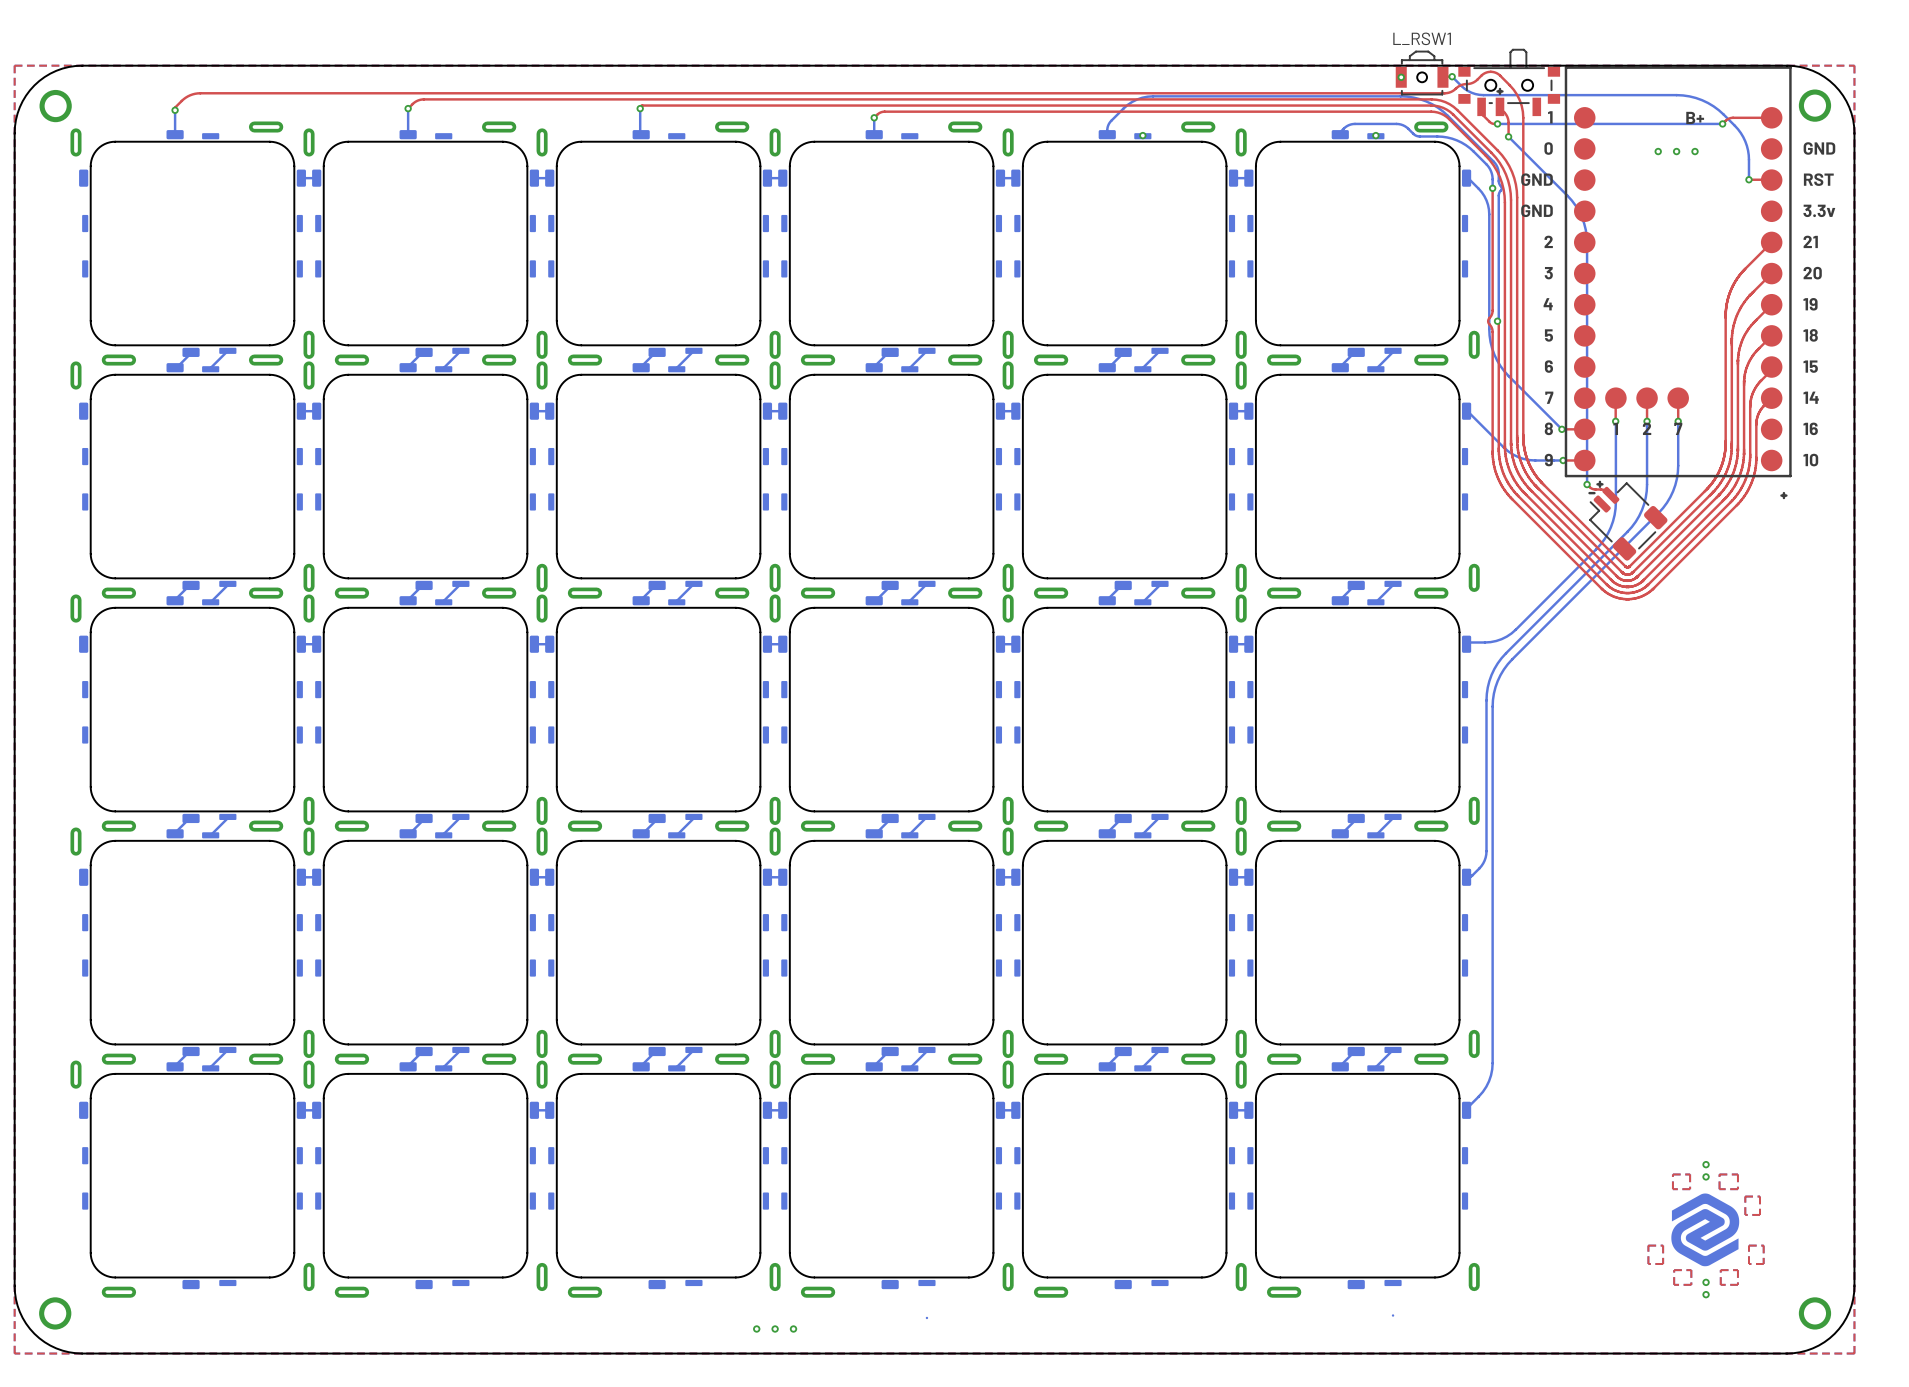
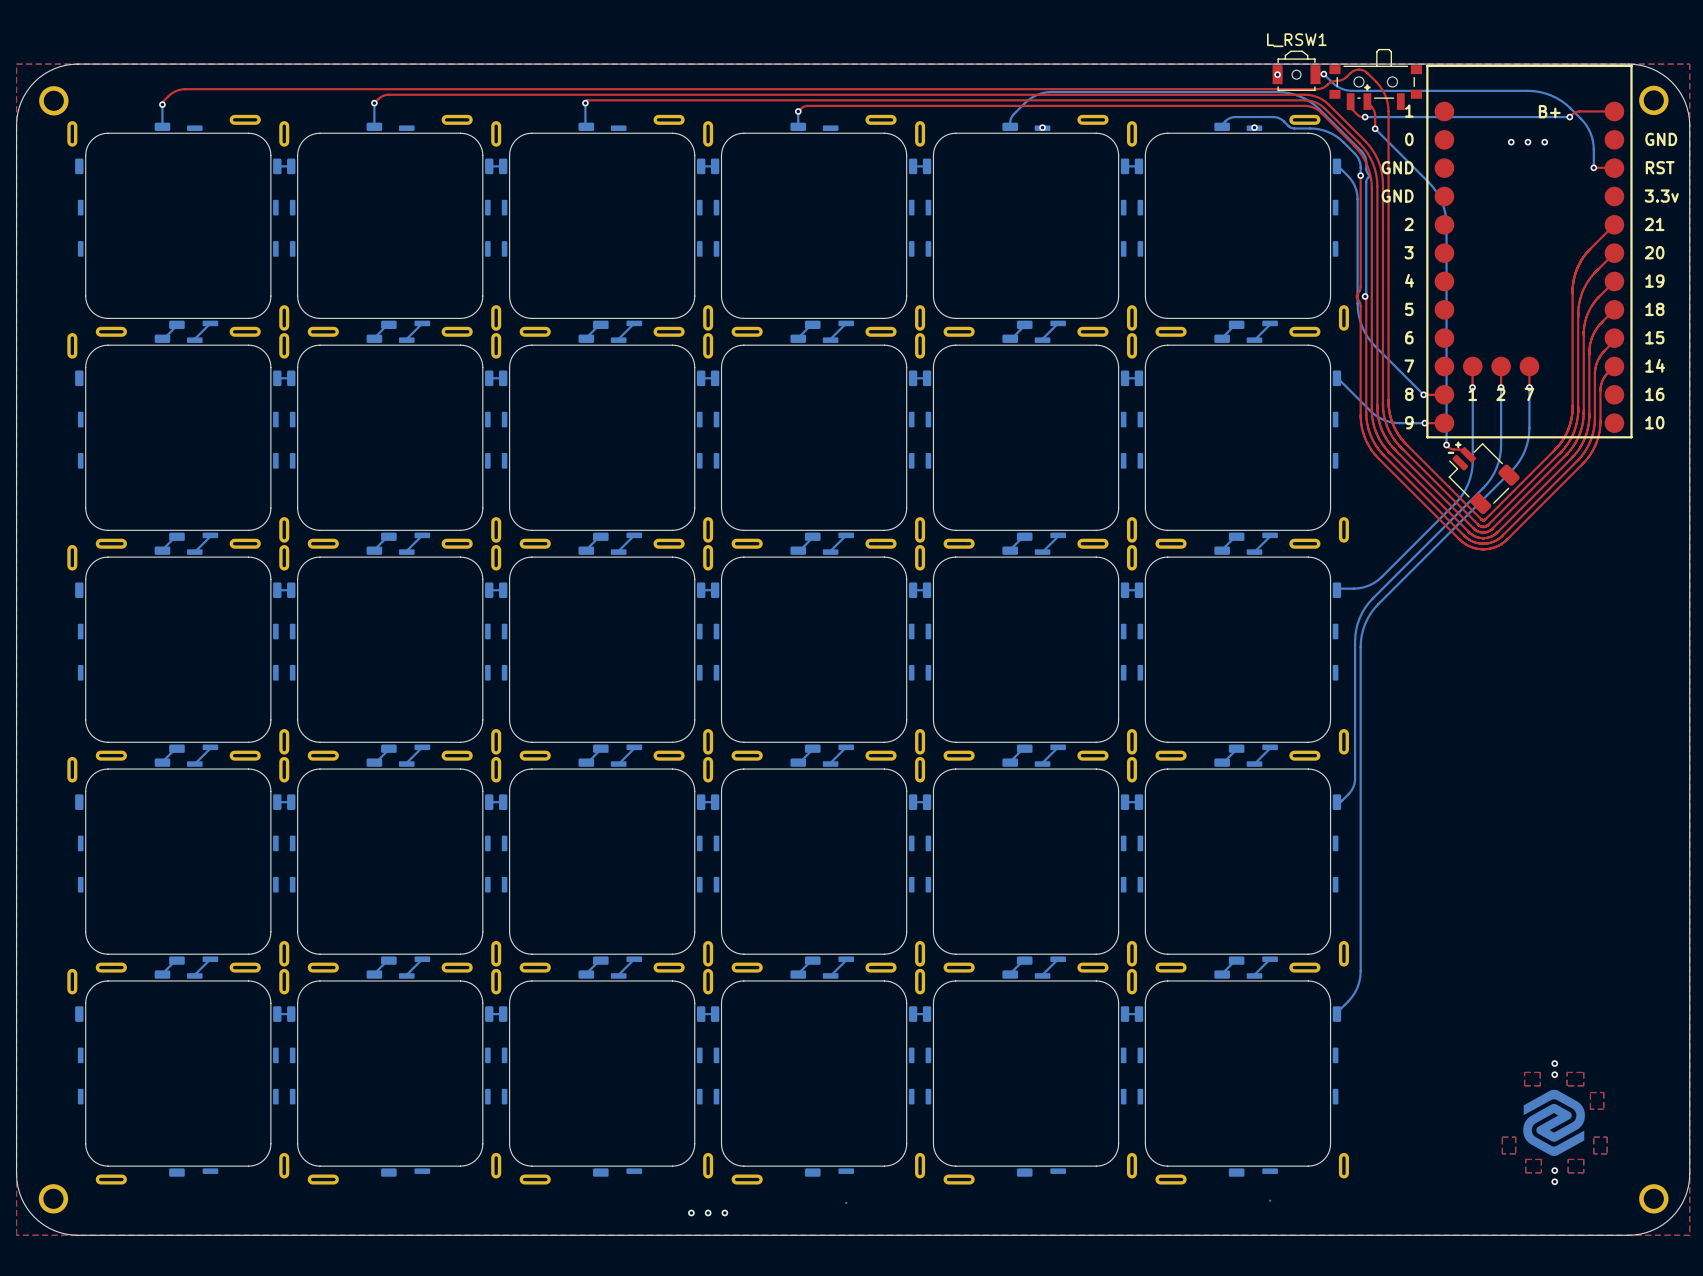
line: (1783, 493) (1783, 498) -> none
line: (1781, 495) (1786, 495) -> none

